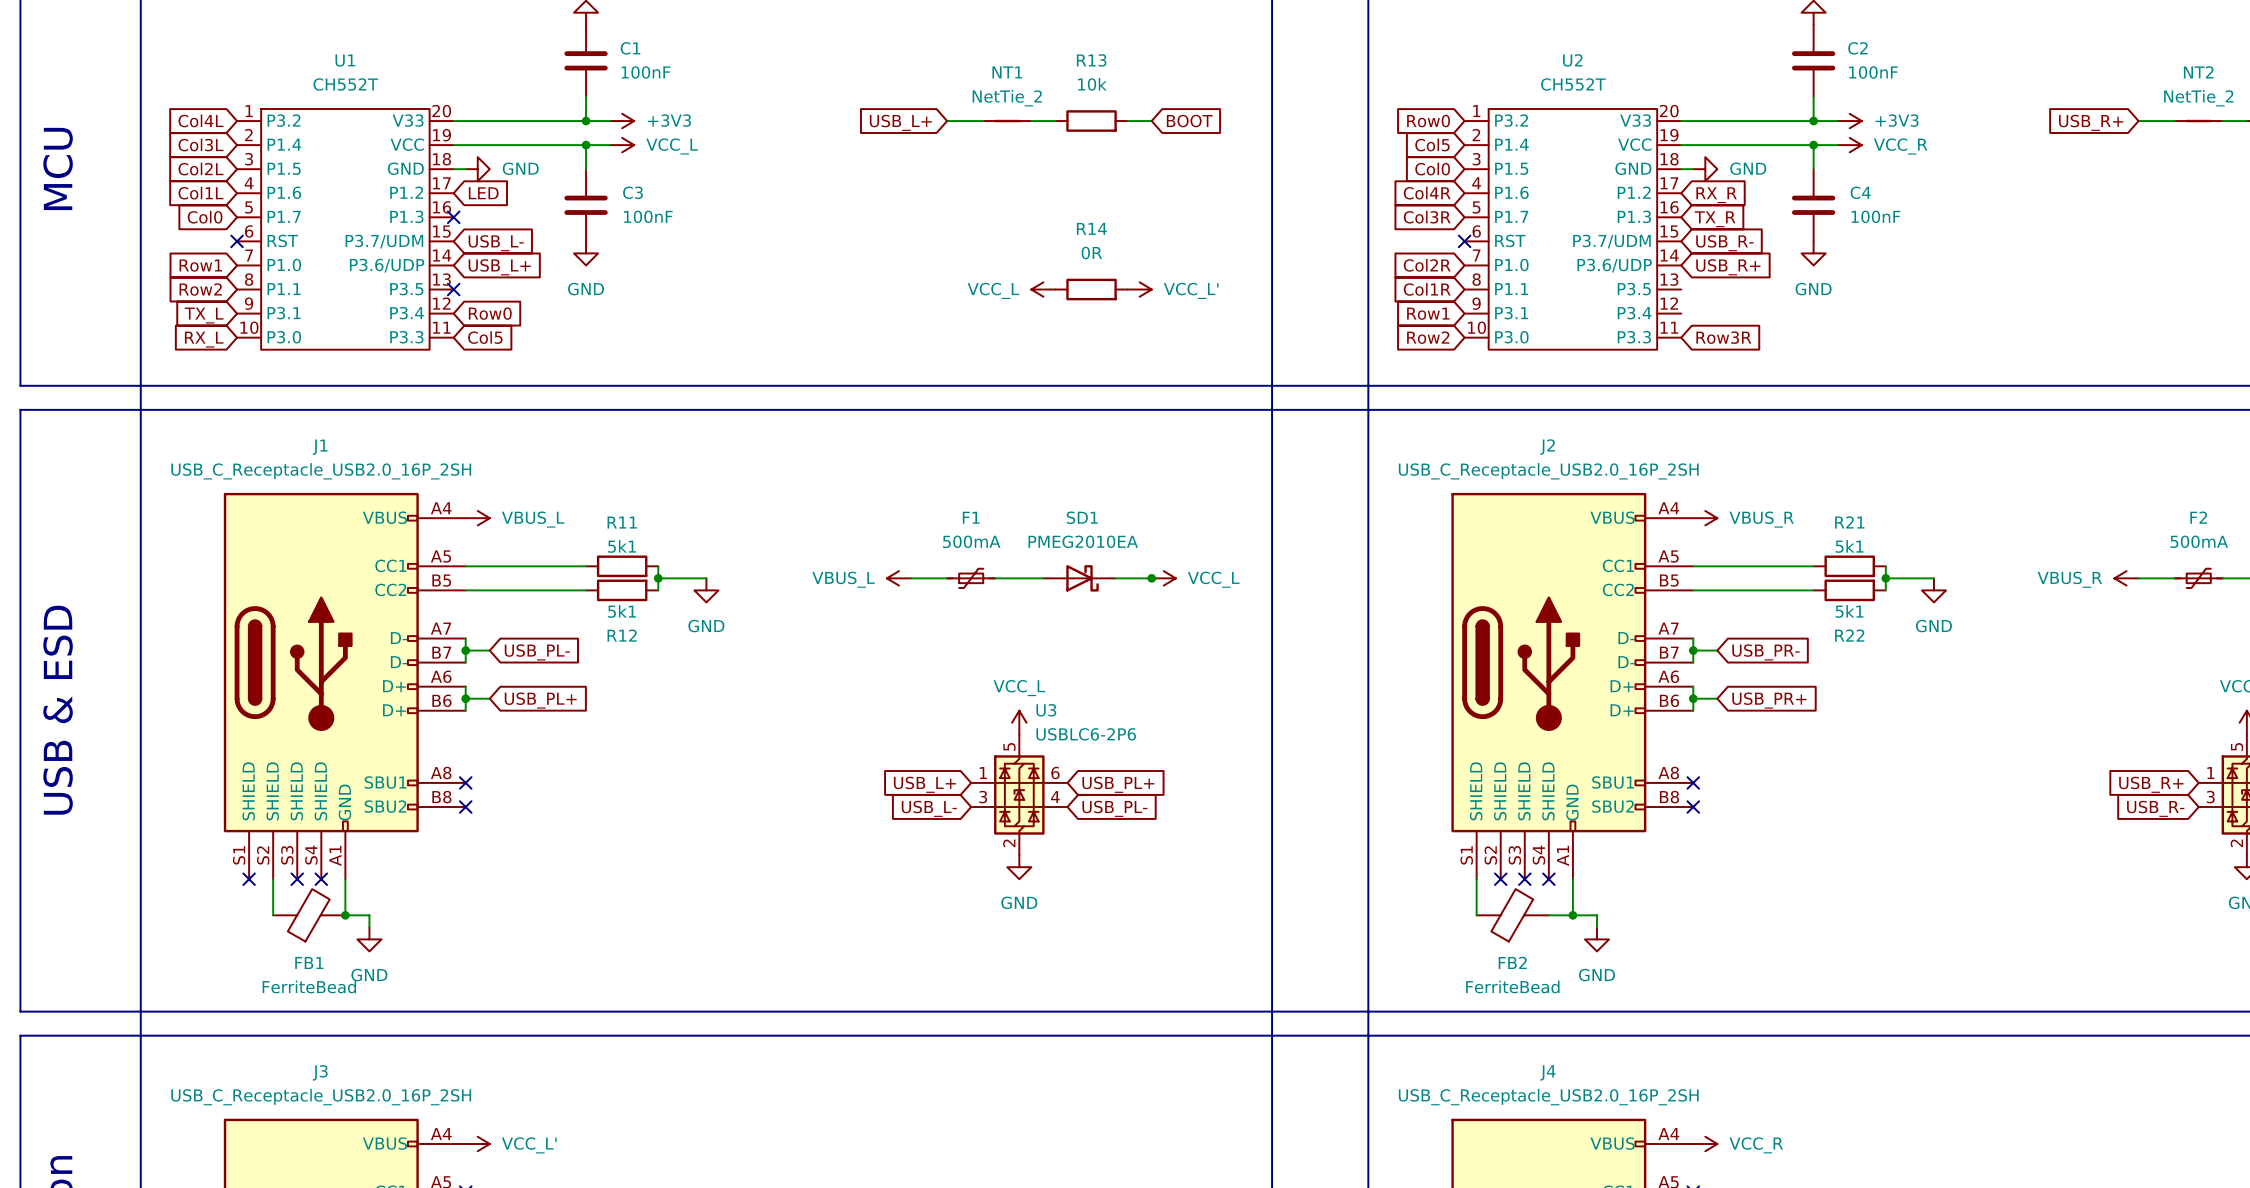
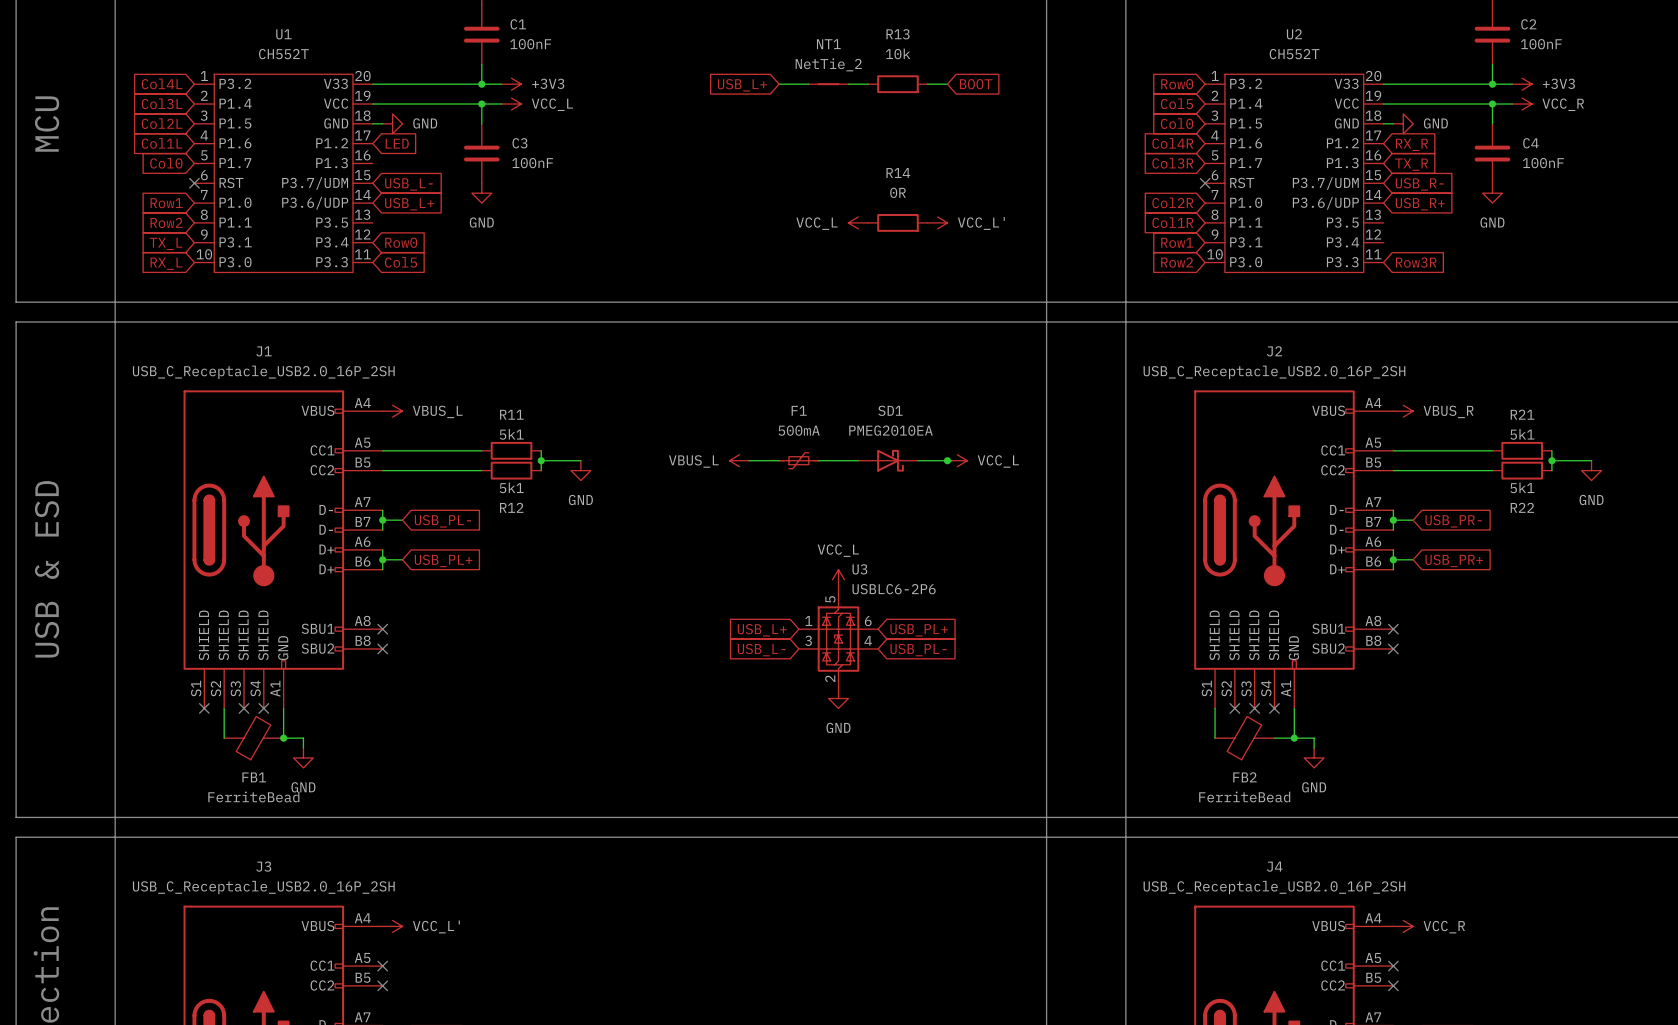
no-connect mark: (453, 217) -> none
no-connect mark: (453, 289) -> none

